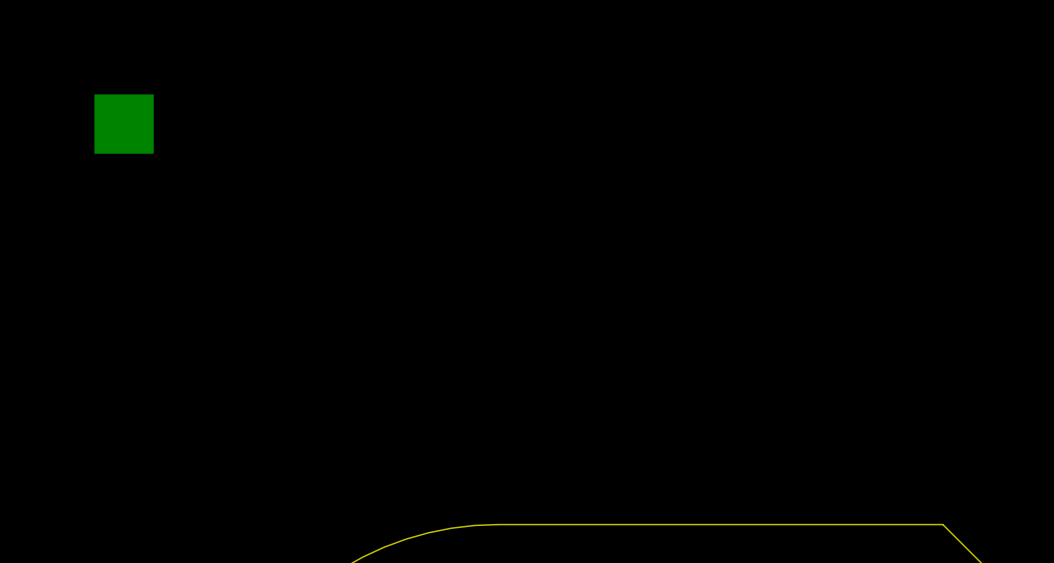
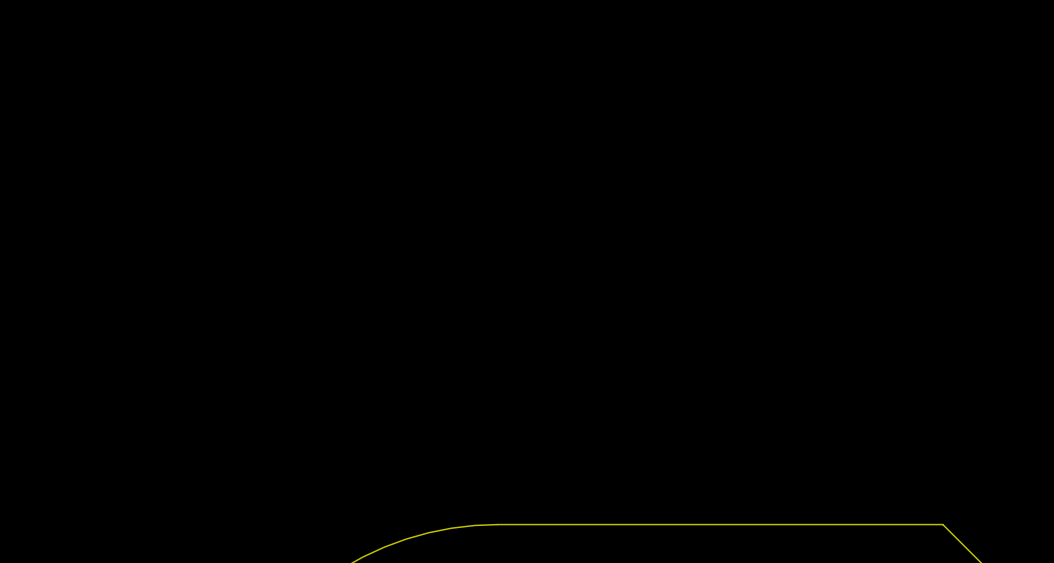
part: (124, 124) -> none

